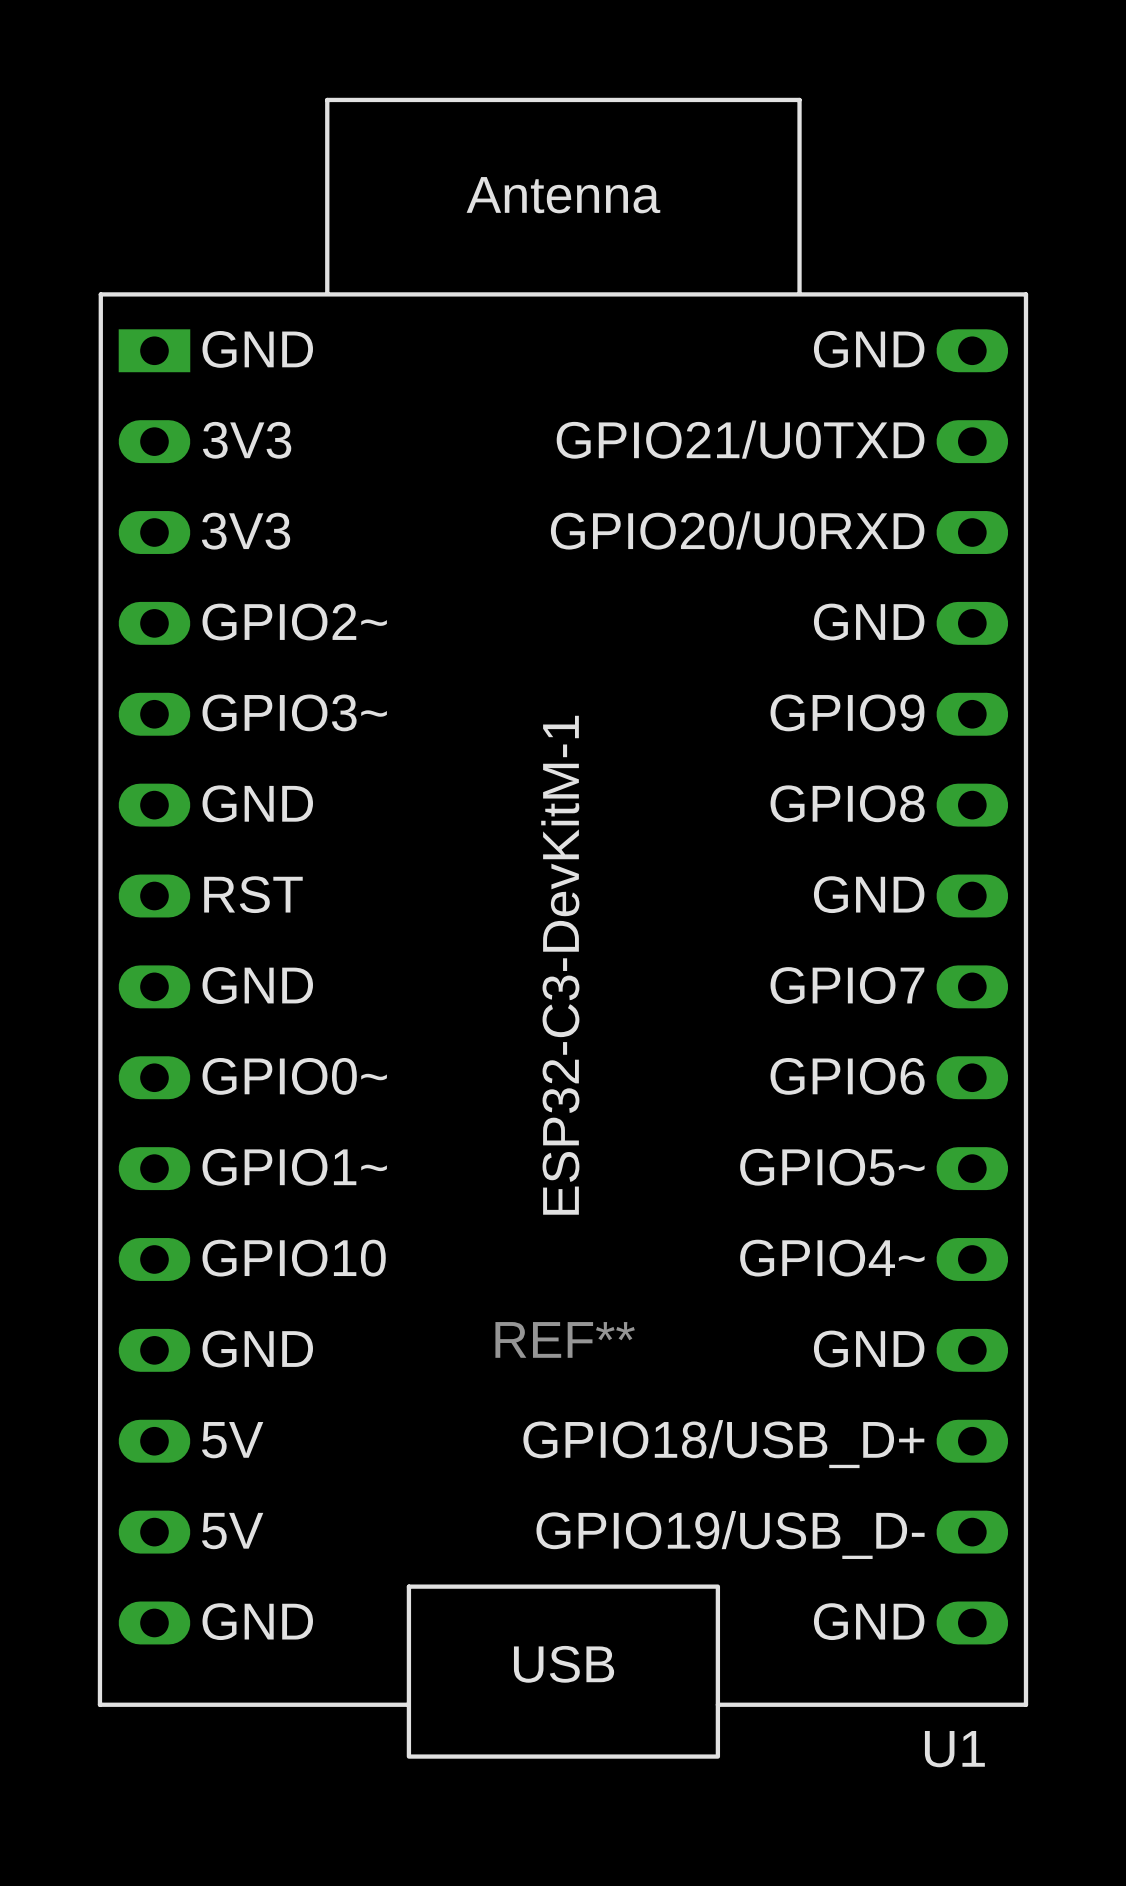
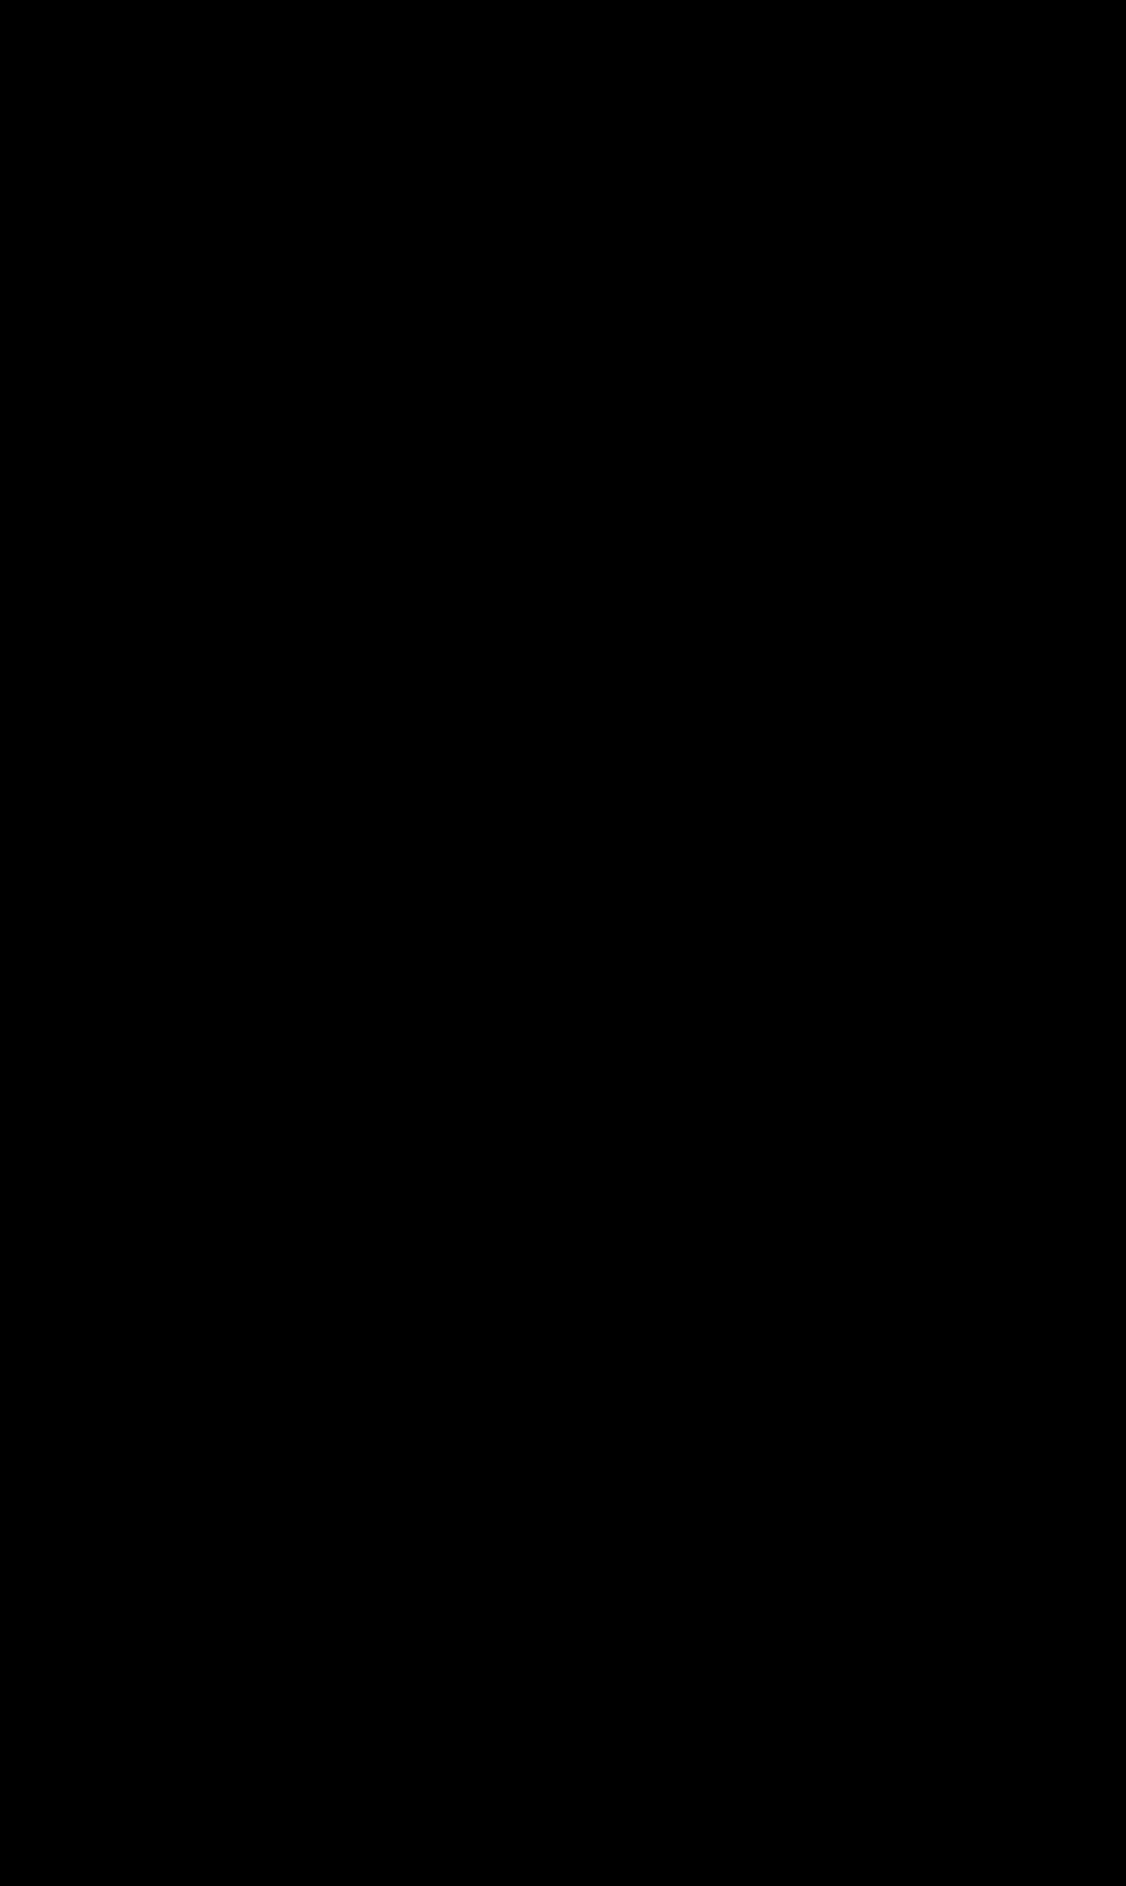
U1: ESP32-C3-DevKitM-1 (562, 928) -> none

